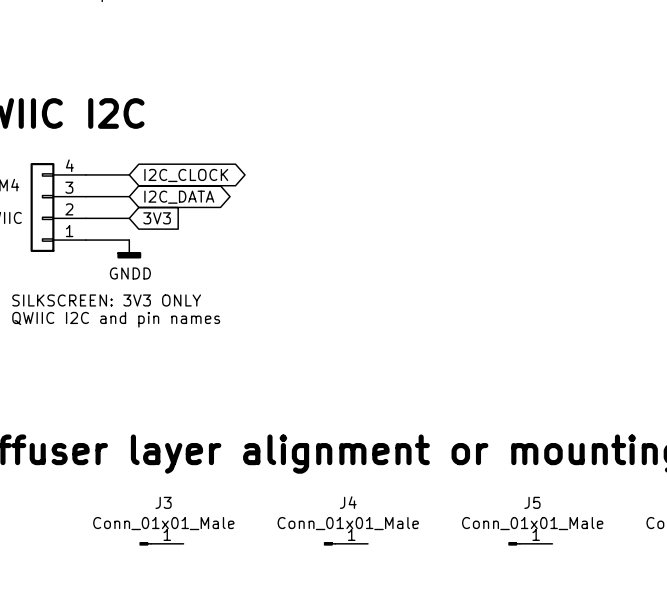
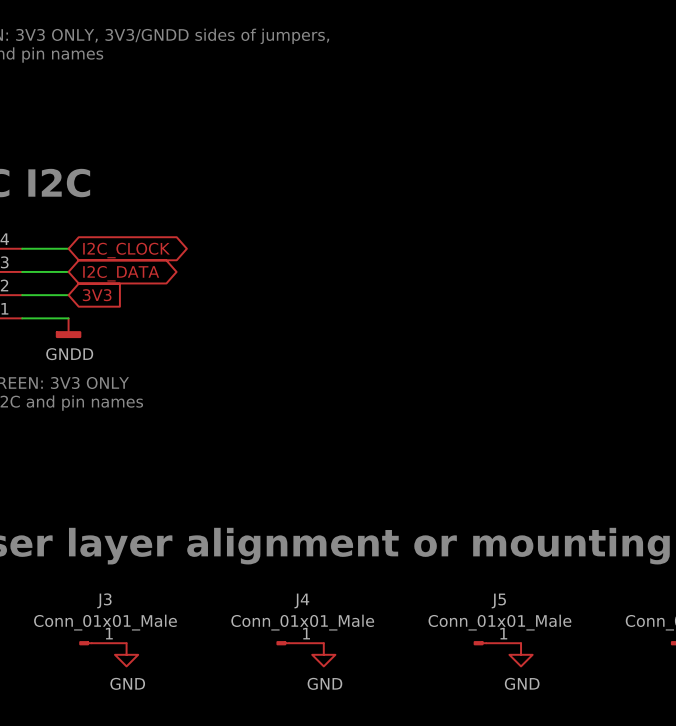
power symbol: none -> GND (126, 654)
power symbol: none -> GND (323, 654)
power symbol: none -> GND (521, 654)

